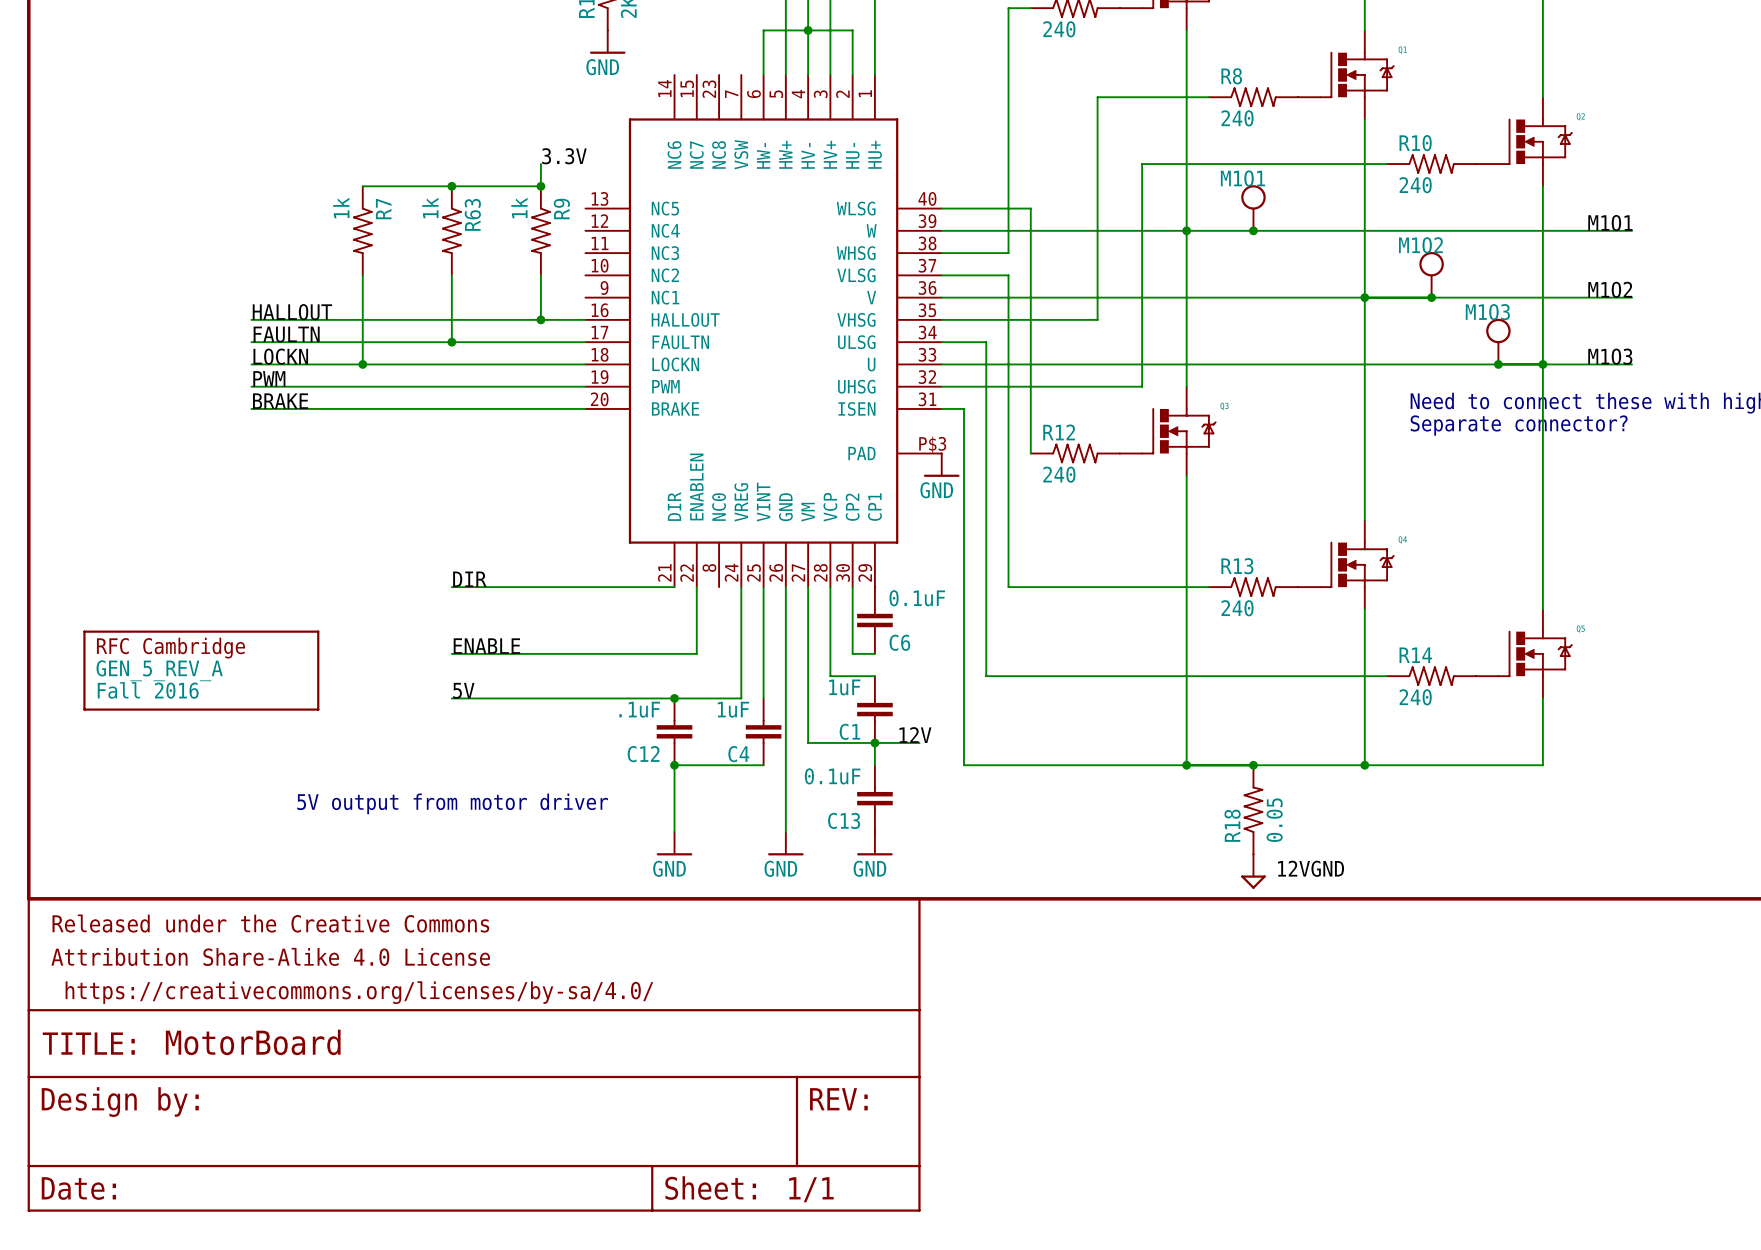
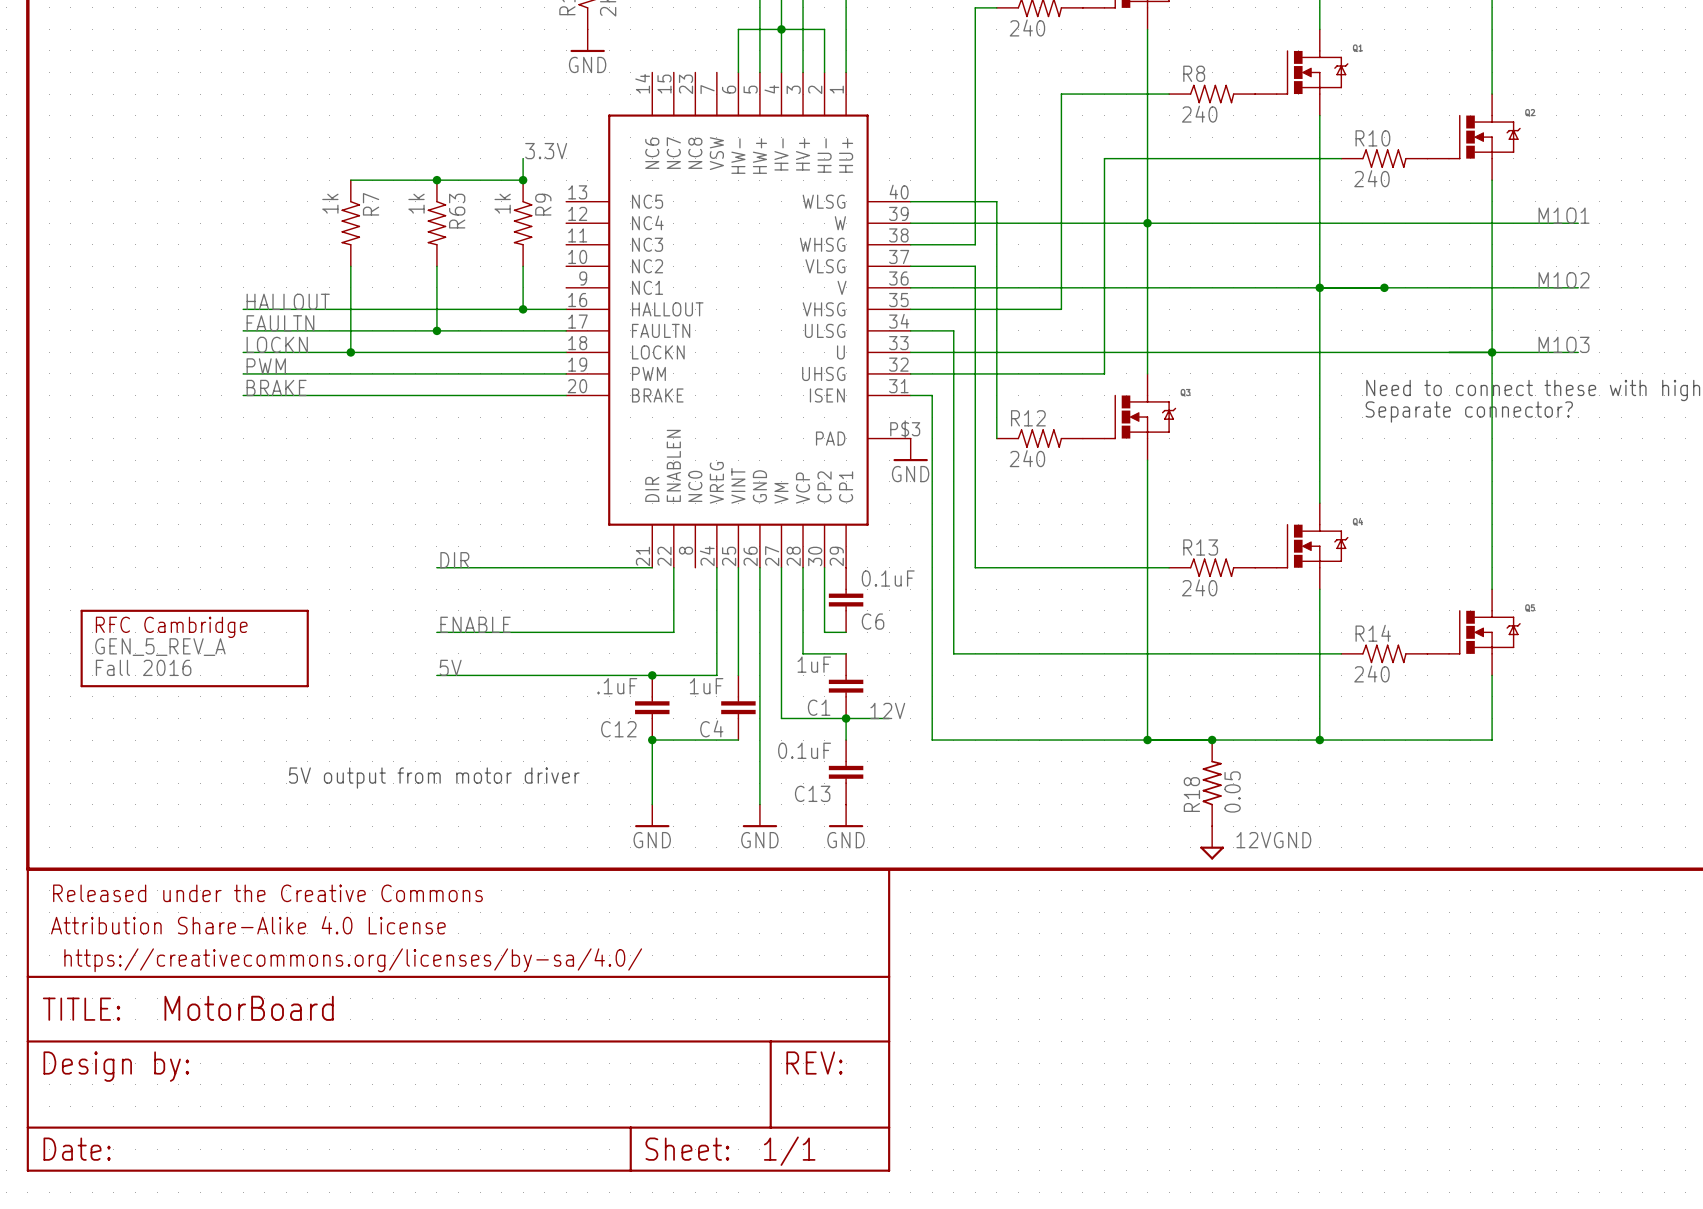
M1O1: (1253, 208) -> none
junction: (1253, 230) -> none
M1O2: (1431, 274) -> none
M1O3: (1498, 341) -> none
junction: (1498, 364) -> none

